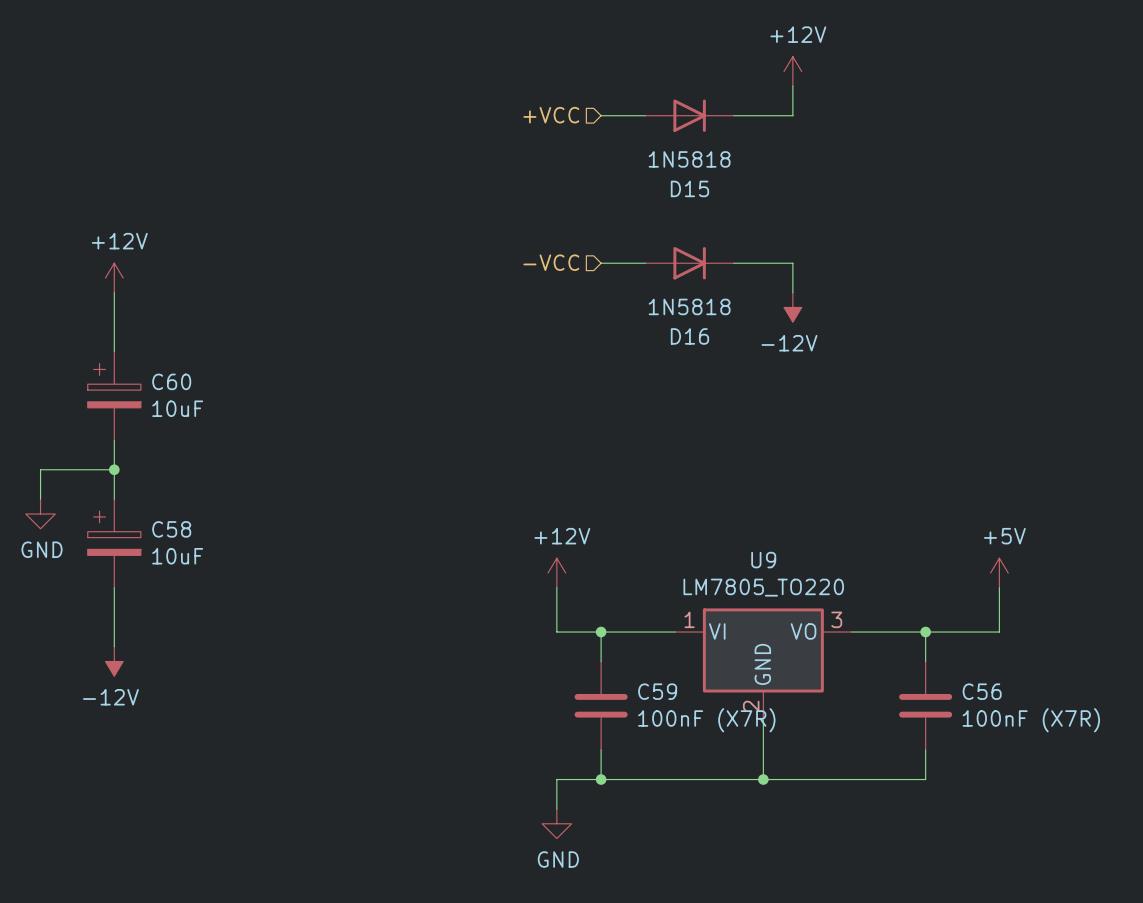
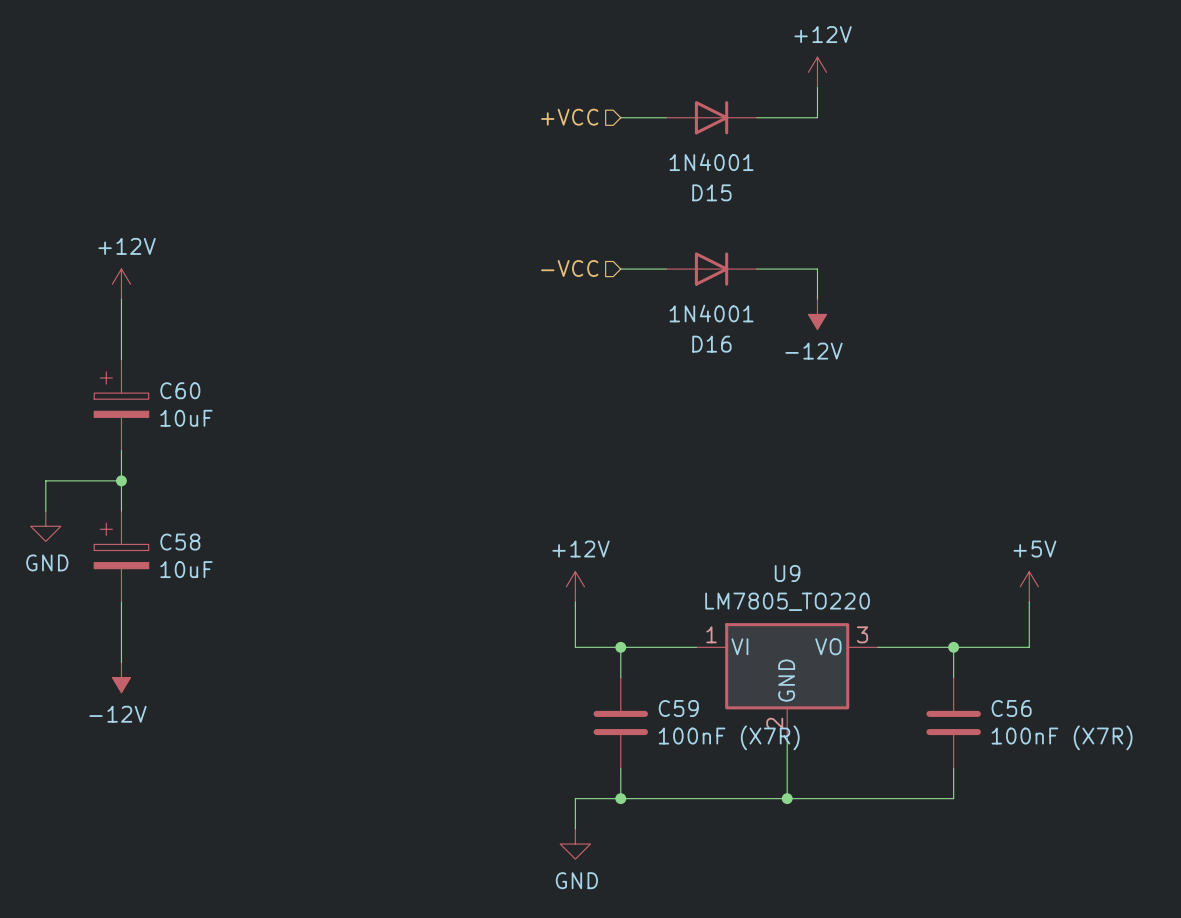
D15 value: 1N5818 (689, 159) -> 1N4001 (711, 162)
D16 value: 1N5818 (689, 306) -> 1N4001 (711, 313)

